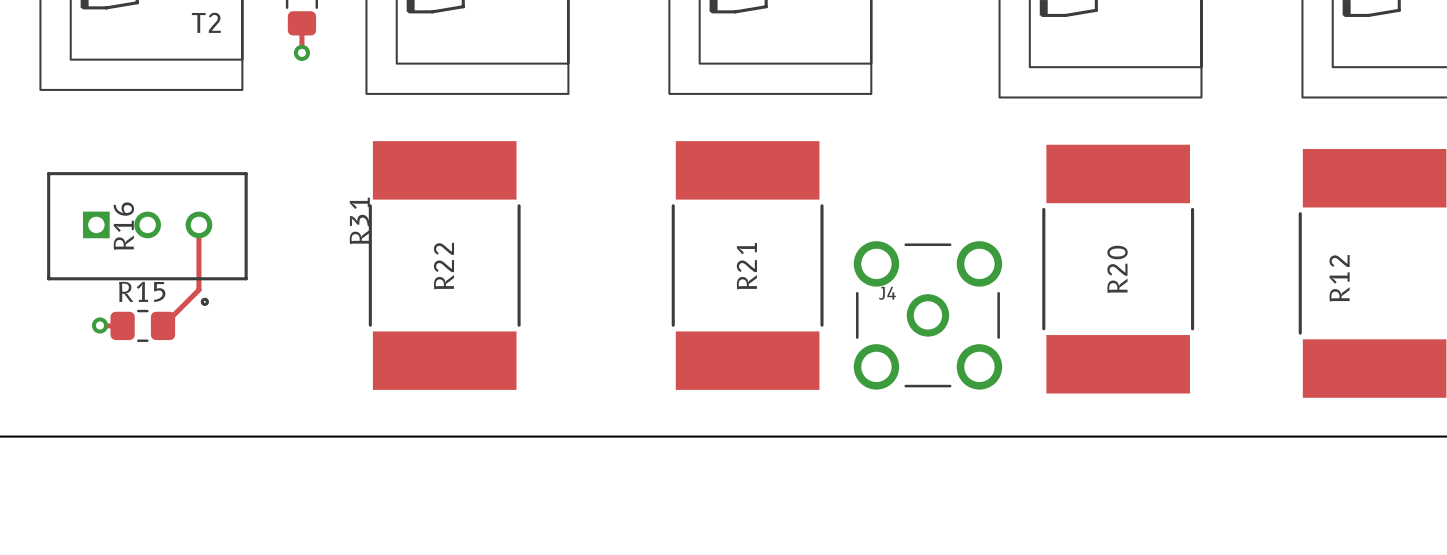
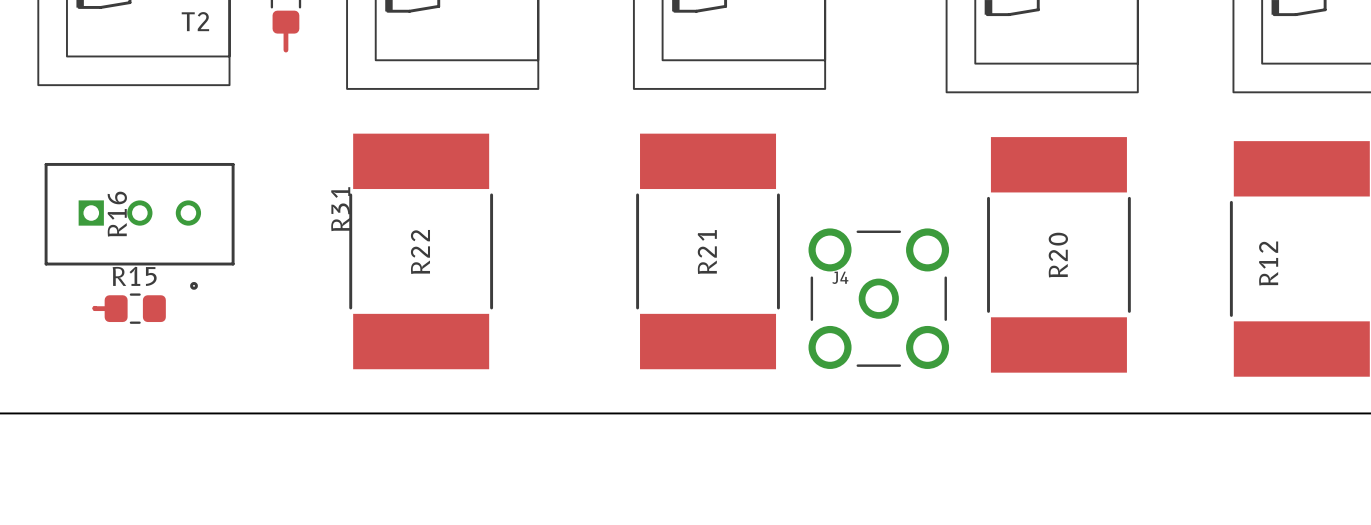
via: (301, 52) -> none
track: (198, 224) (198, 289) (163, 325) -> none
via: (100, 325) -> none

